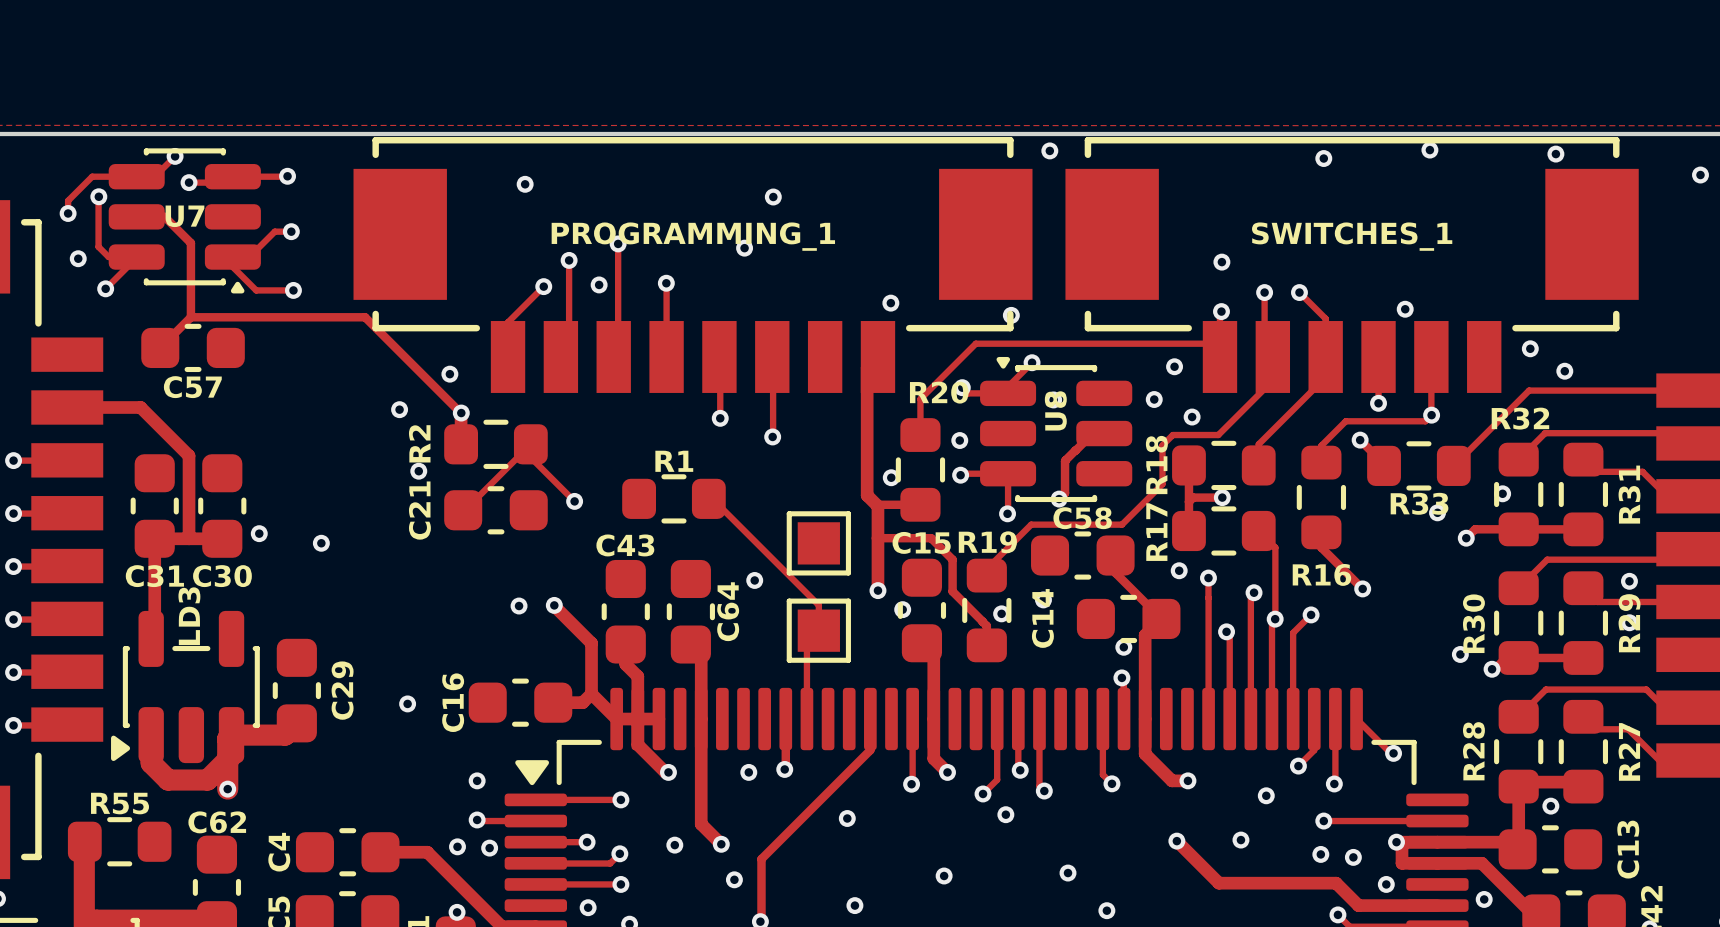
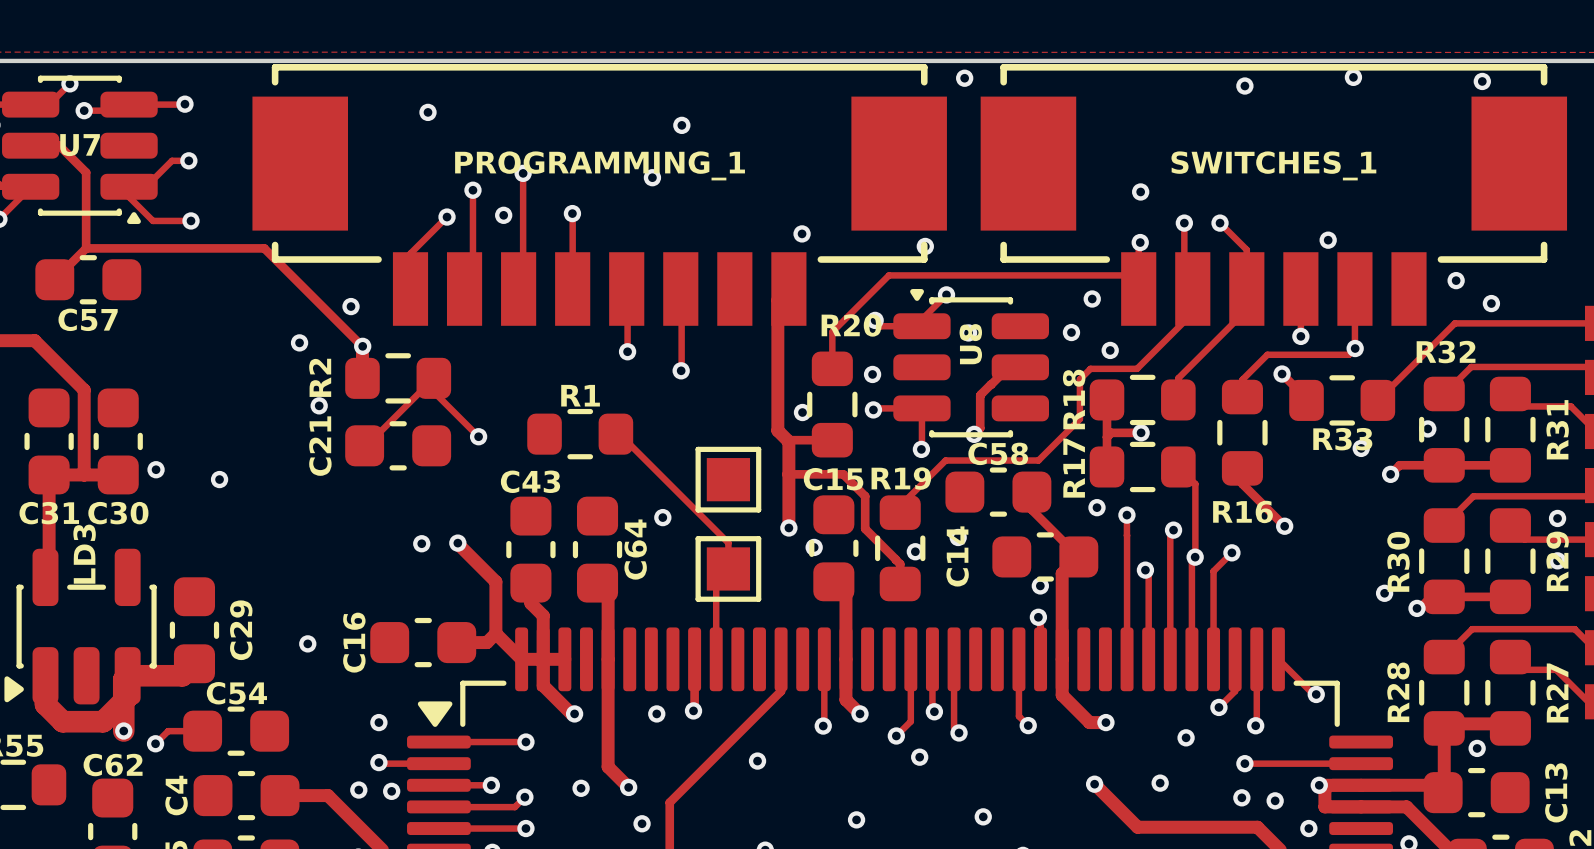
track: none -> (202, 731) (168, 731) (155, 743)
C54: none -> (236, 731)
via: none -> (155, 743)

